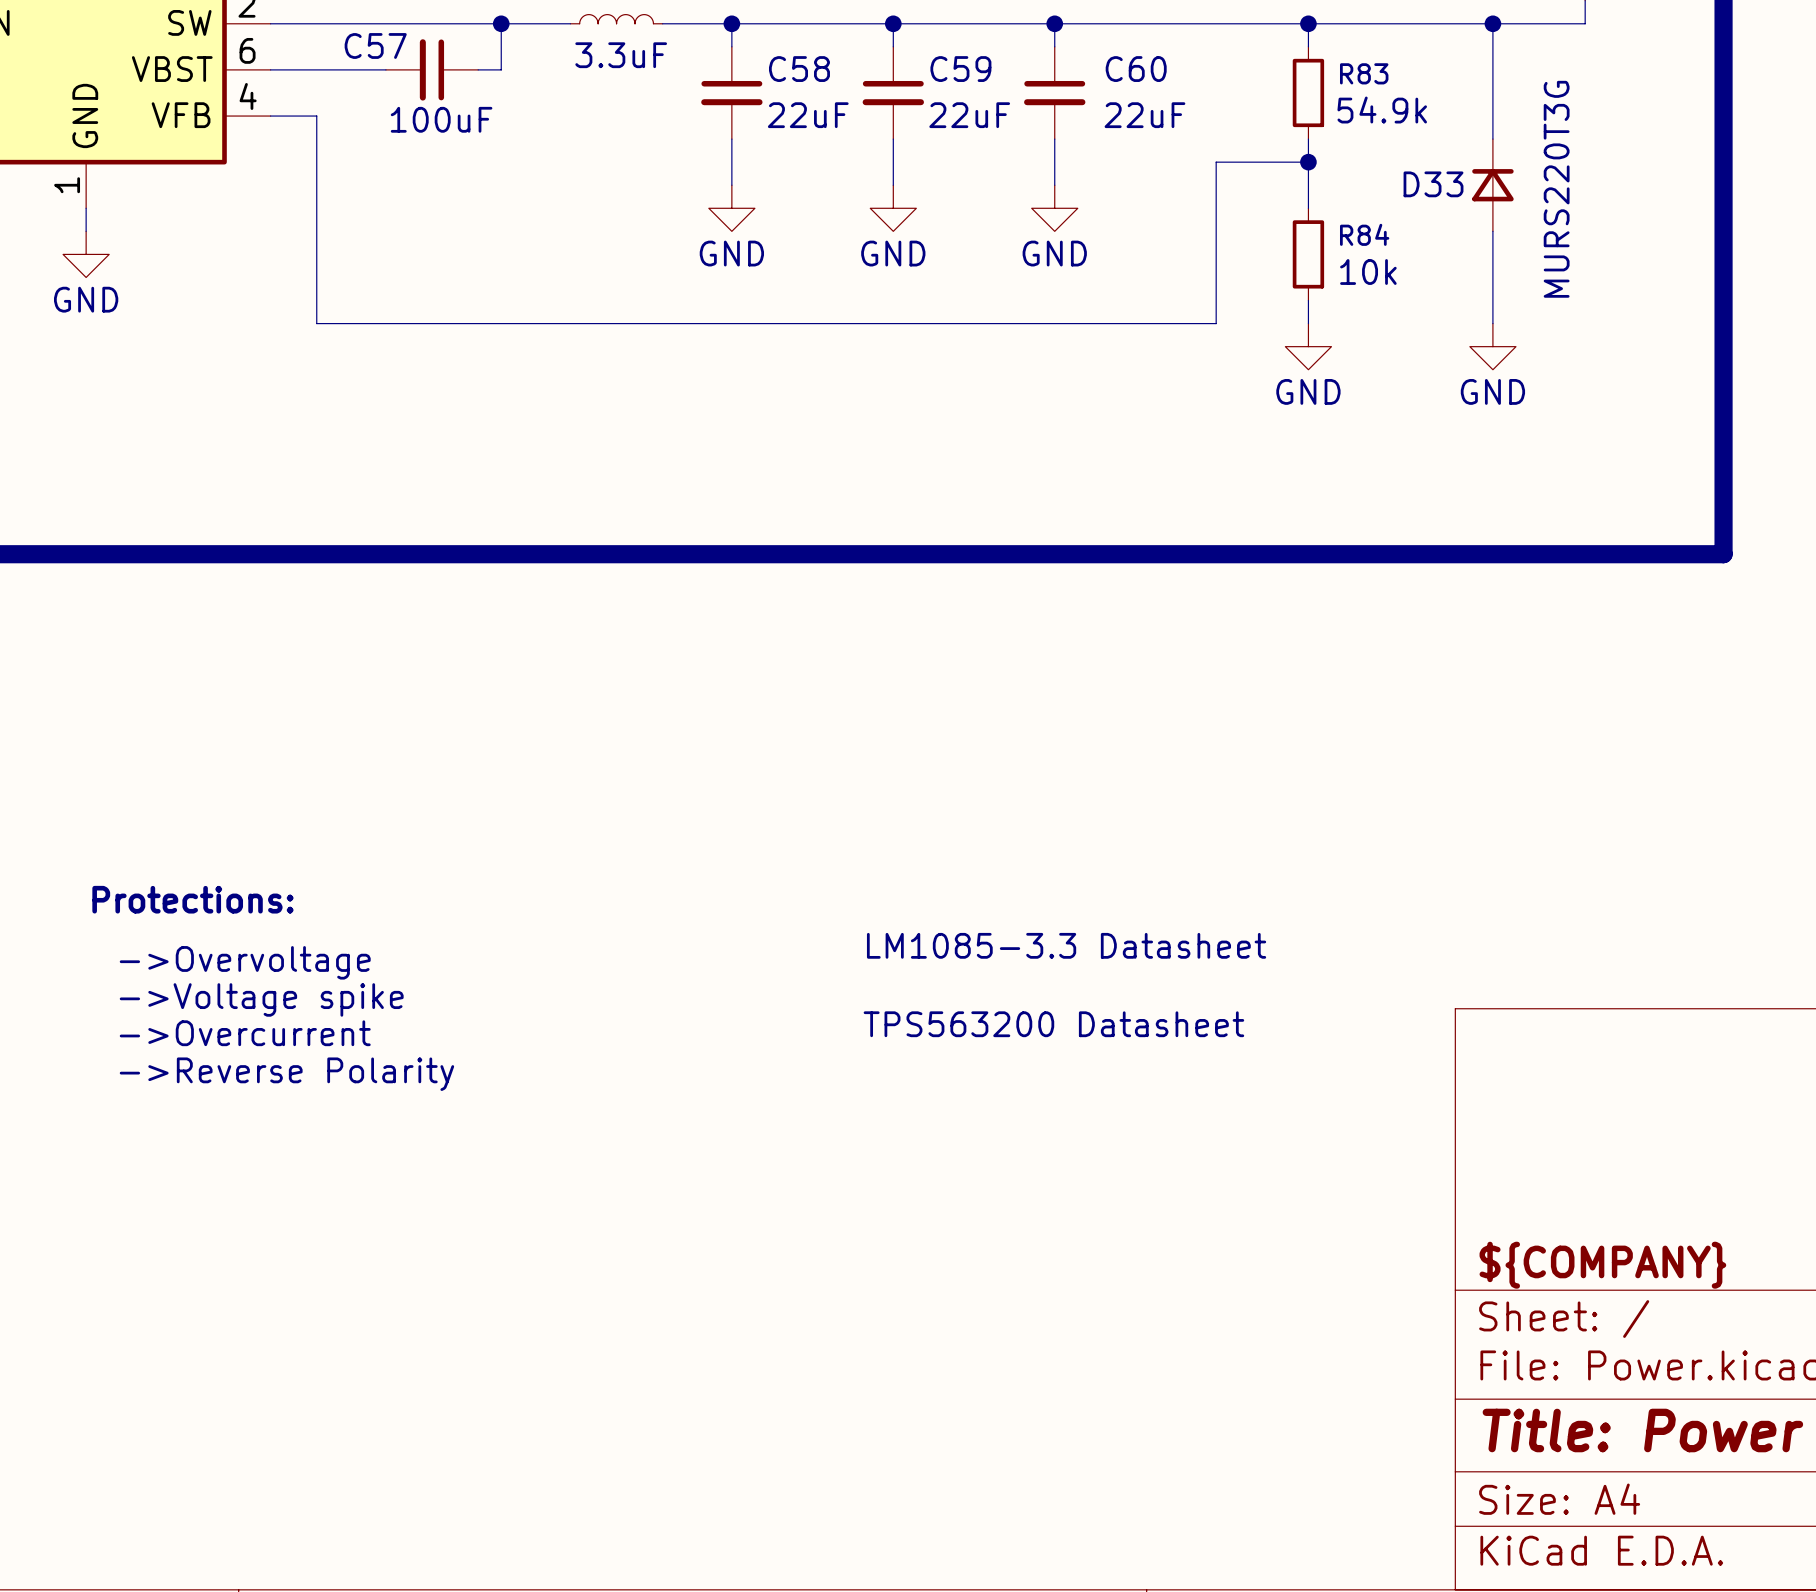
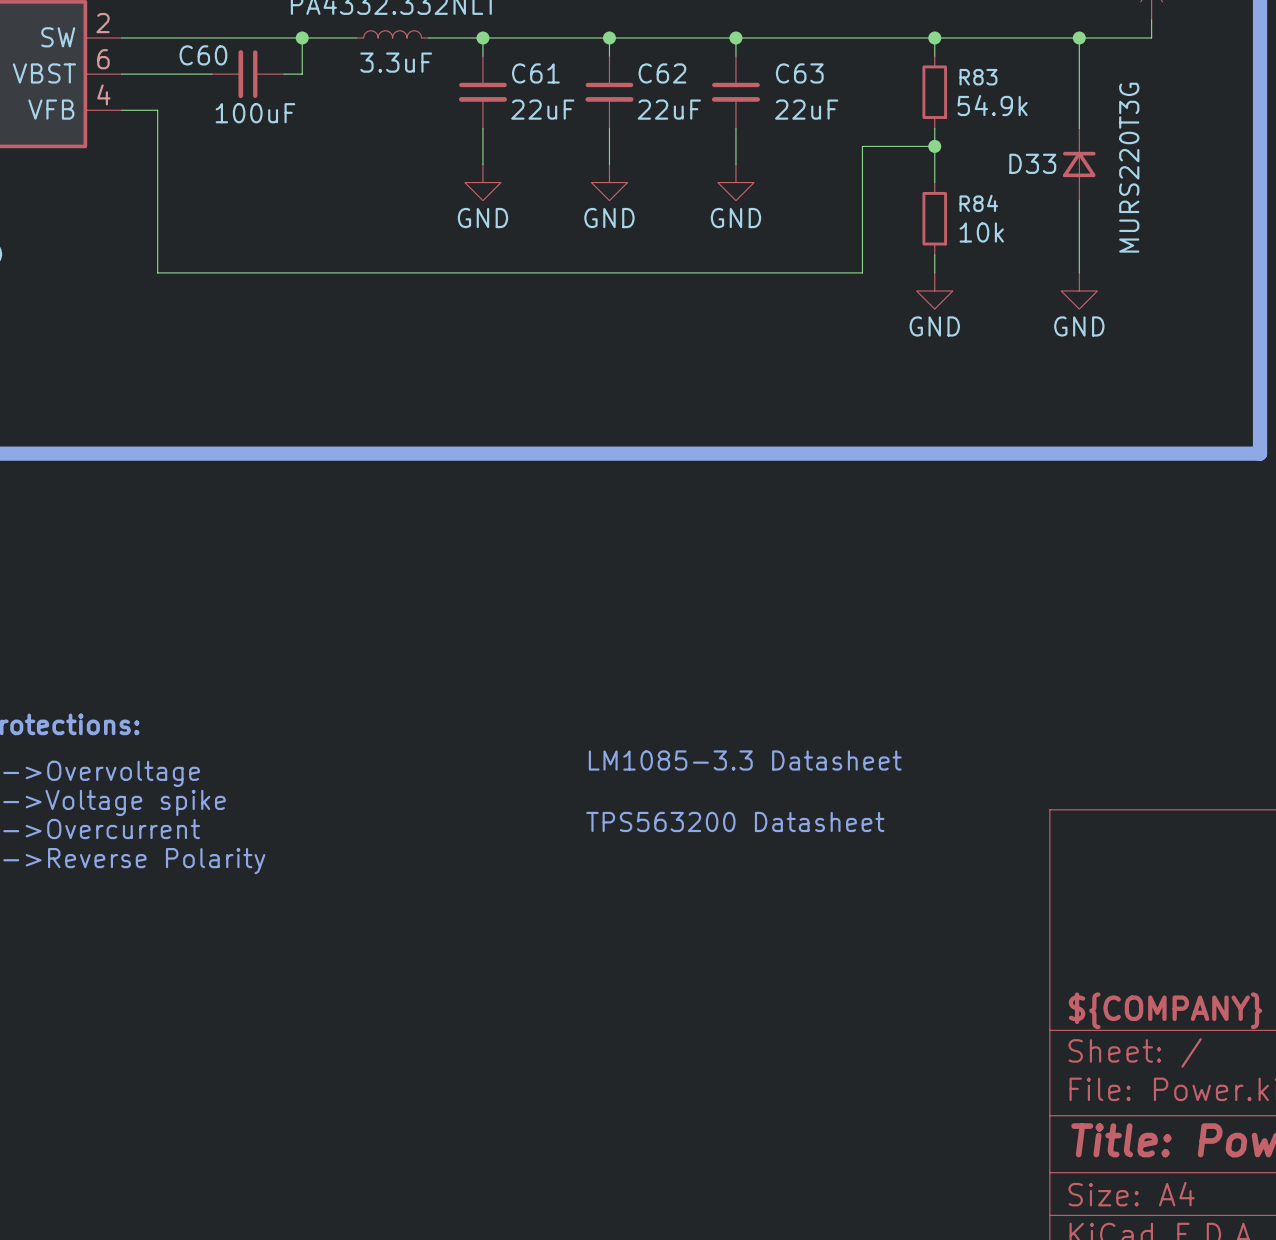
C57 name: C57 (375, 45) -> C60 (203, 55)
C58 name: C58 (799, 69) -> C61 (535, 73)
C59 name: C59 (960, 69) -> C62 (662, 73)
C60 name: C60 (1136, 69) -> C63 (799, 73)

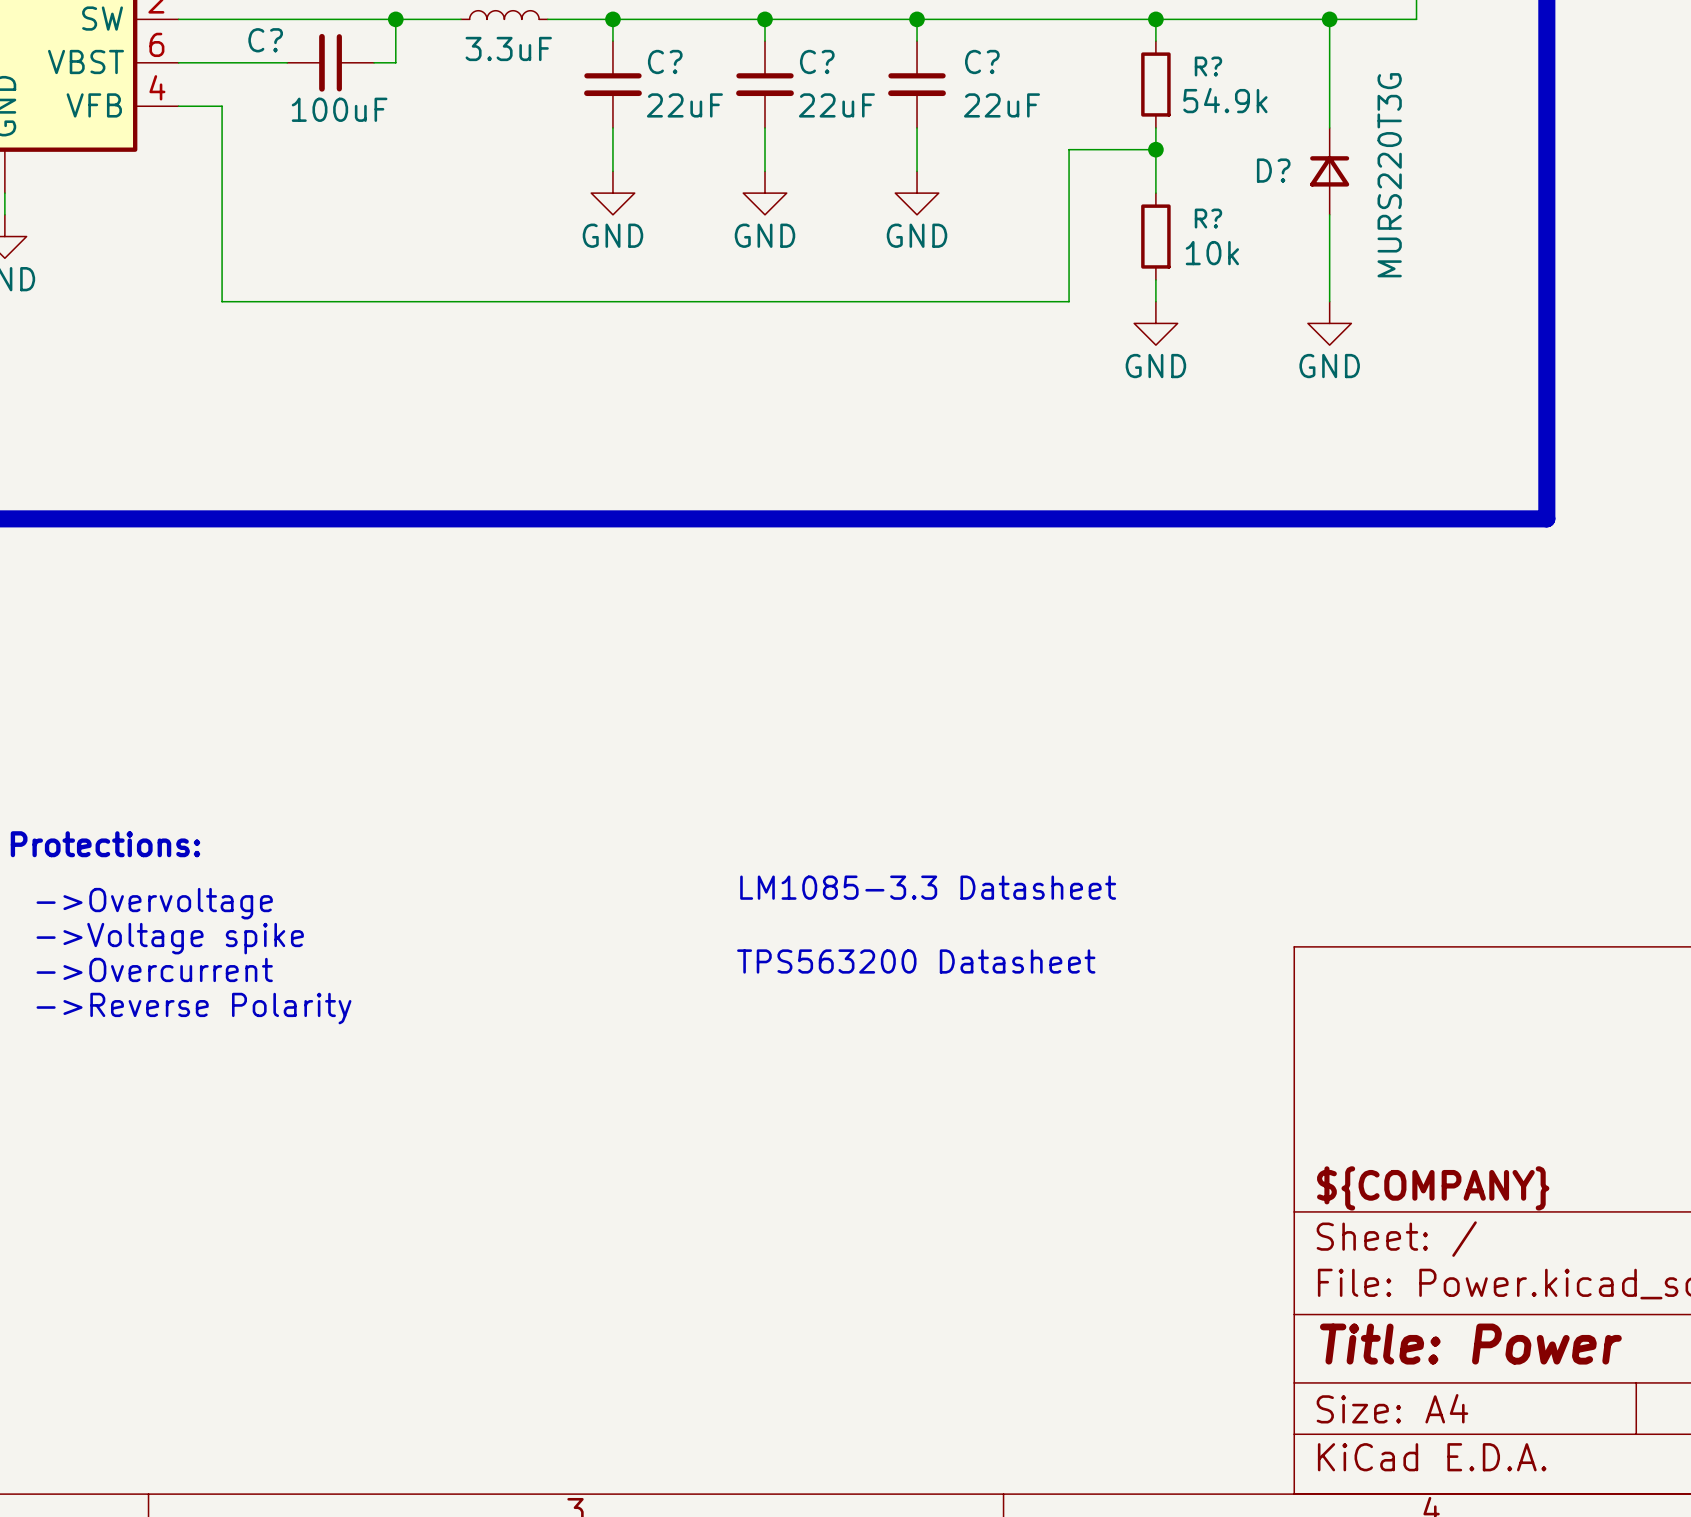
C60 name: C60 (203, 55) -> C? (265, 40)
C61 name: C61 (535, 73) -> C? (665, 61)
C62 name: C62 (662, 73) -> C? (817, 61)
C63 name: C63 (799, 73) -> C? (982, 61)
R83 name: R83 (978, 77) -> R? (1208, 66)
D33 name: D33 (1032, 163) -> D? (1273, 170)
R84 name: R84 (978, 203) -> R? (1208, 218)

